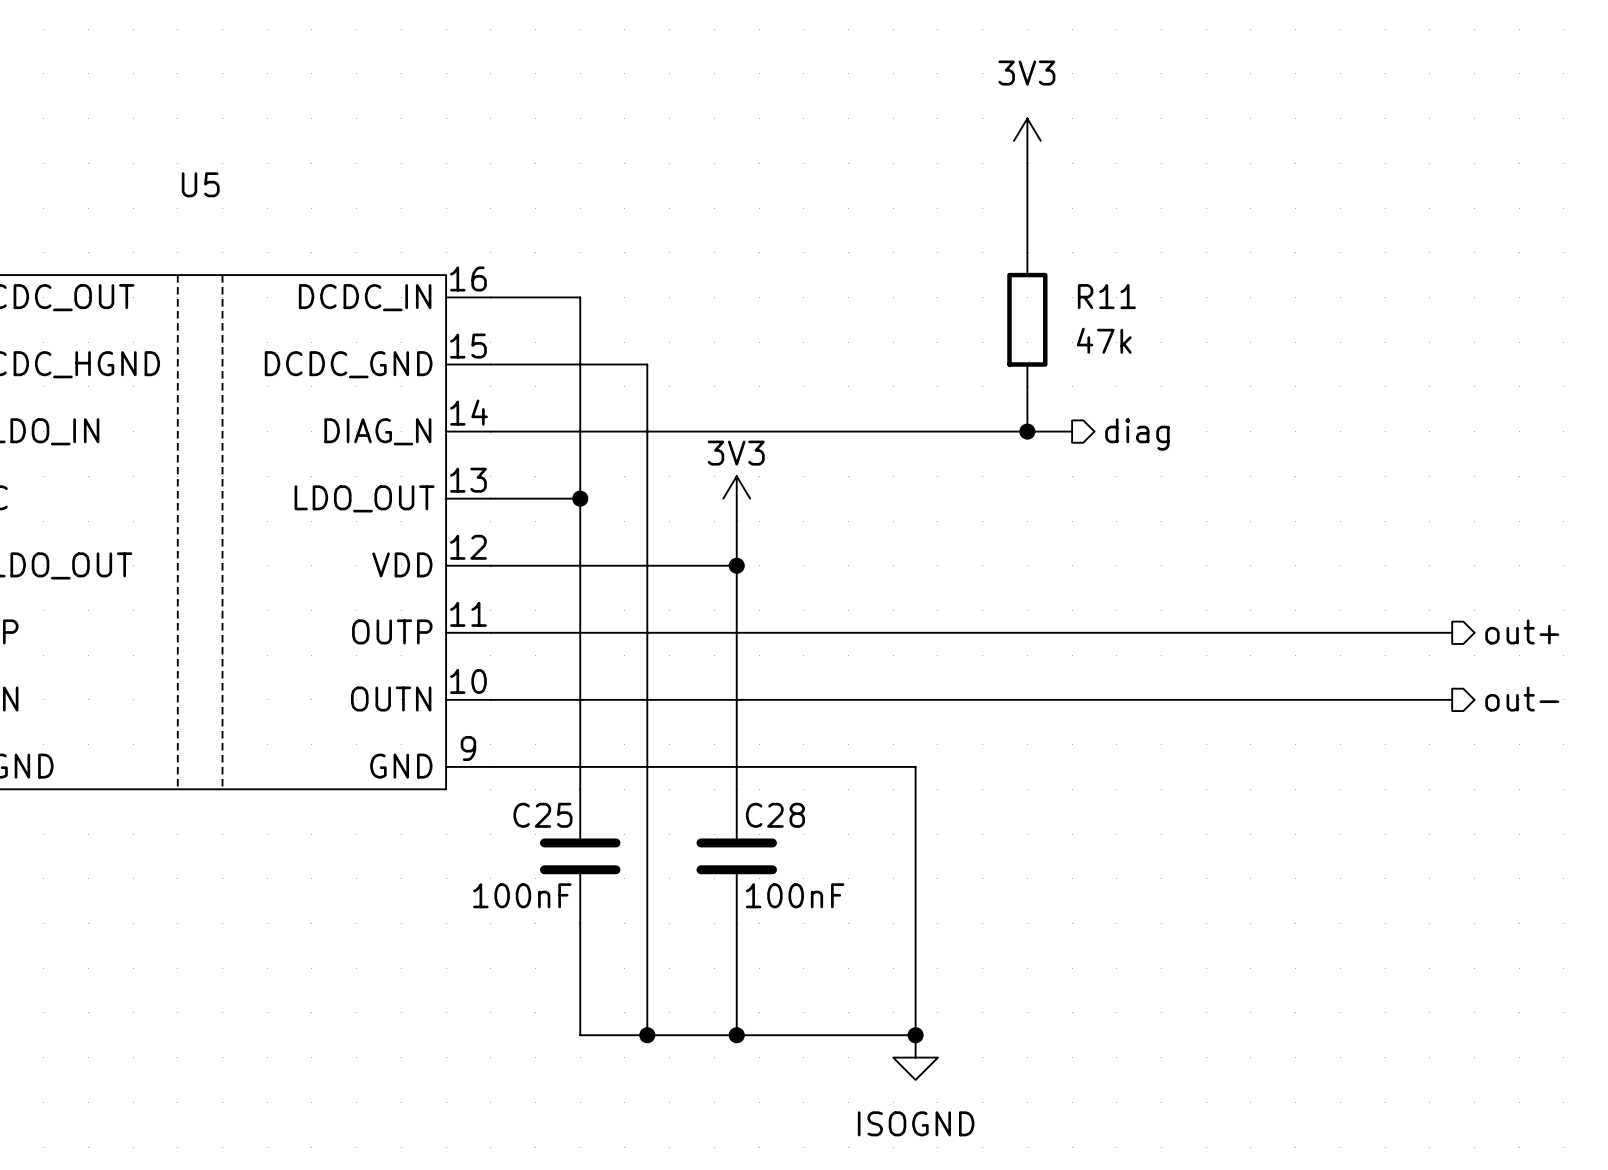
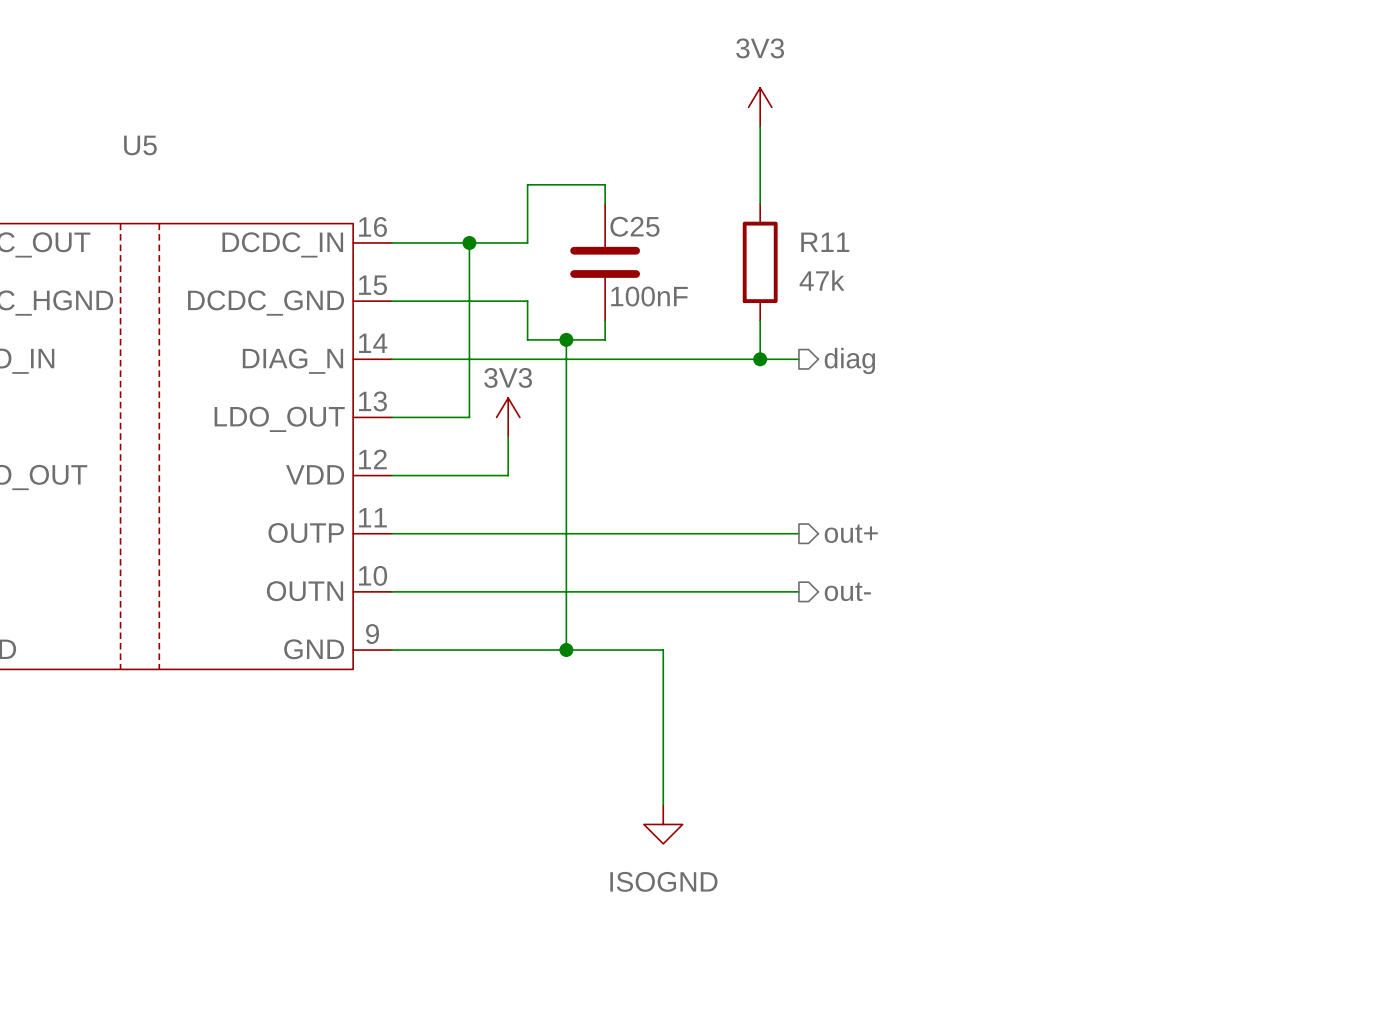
power symbol position: 3V3 (1027, 140) -> 3V3 (760, 107)
wire: (1027, 163) (1027, 252) -> (760, 126) (760, 204)
wire: none -> (605, 204) (605, 184) (527, 184) (527, 242) (469, 242)
junction: none -> (469, 242)
R11 position: (1027, 319) -> (760, 262)
wire: (1027, 386) (1027, 431) -> (760, 320) (760, 359)
wire: (647, 409) (647, 1035) -> (527, 339) (605, 339) (605, 320)
wire: none -> (566, 339) (566, 650)
junction: none -> (566, 339)
junction: none -> (760, 359)
wire: (960, 431) (1072, 431) -> none
junction: (1027, 431) -> none
hierarchical label position: diag (1137, 434) -> diag (849, 360)
wire: (580, 498) (580, 789) -> none
junction: (580, 498) -> none
power symbol position: 3V3 (736, 498) -> 3V3 (508, 417)
wire: (736, 521) (736, 789) -> none
wire: (624, 565) (736, 565) -> (508, 475) (508, 436)
junction: (736, 565) -> none
hierarchical label: none -> out+ (851, 533)
hierarchical label: out+ (1522, 631) -> none
wire: (960, 632) (1452, 632) -> none
wire: (960, 699) (1452, 699) -> none
hierarchical label: none -> out- (847, 591)
hierarchical label: out- (1522, 699) -> none
junction: none -> (566, 650)
wire: (803, 766) (915, 766) (915, 1035) (580, 1035) (580, 923) -> (663, 650) (663, 805)
C25 name position: C25 (542, 815) -> C25 (634, 226)
C25 position: (580, 856) -> (605, 262)
C28: 100nF (736, 856) -> none
C25 value position: 100nF (522, 895) -> 100nF (649, 296)
wire: (736, 923) (736, 1035) -> none
junction: (647, 1035) -> none
junction: (736, 1035) -> none
junction: (915, 1035) -> none
power symbol position: ISOGND (915, 1057) -> ISOGND (663, 824)

